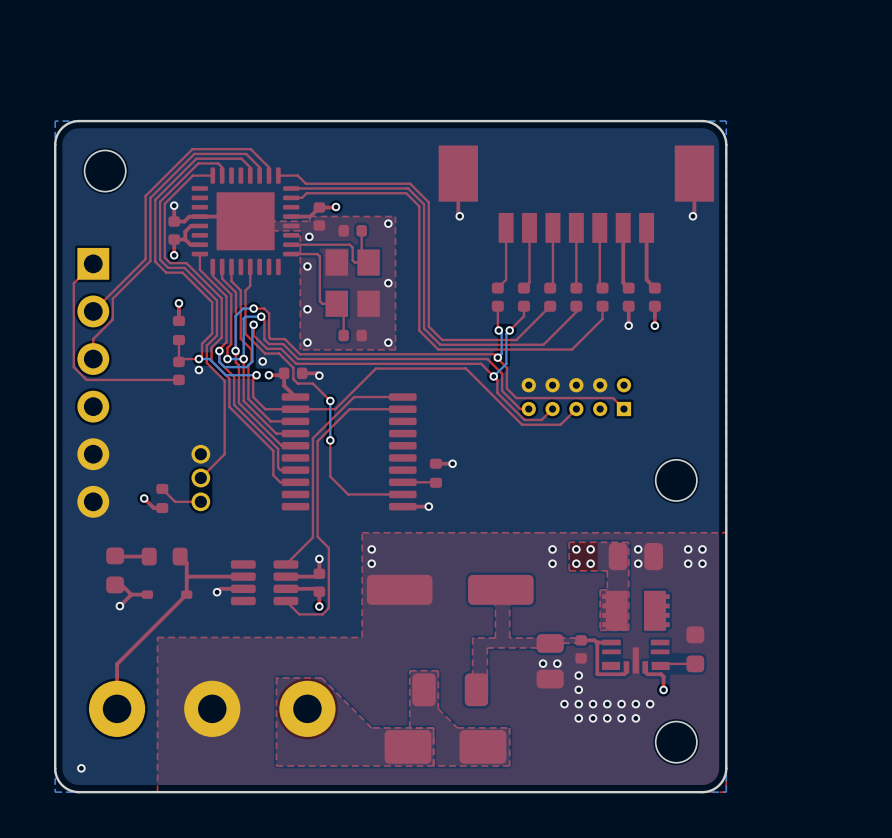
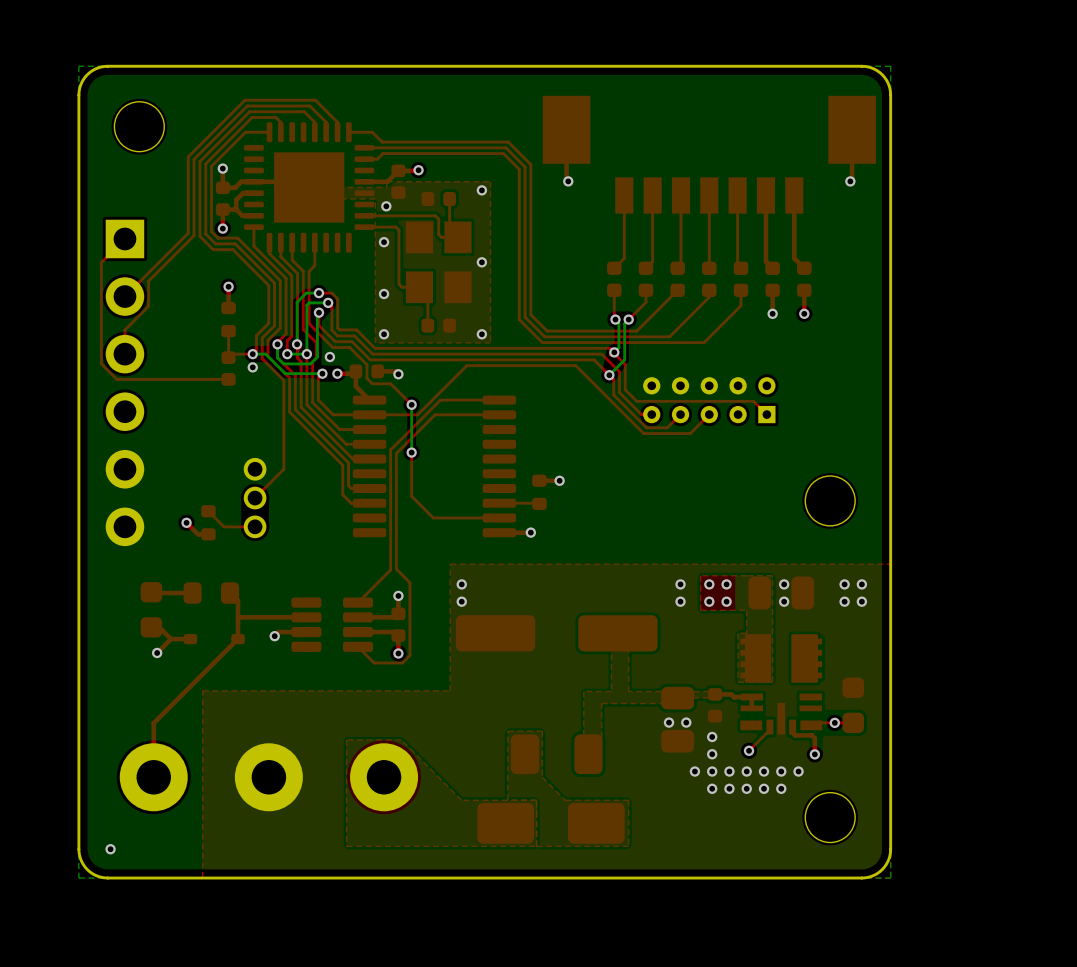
top track: none -> (751, 697) (751, 708)
top track: (597, 643) (597, 674) (624, 674) (626, 669) -> (749, 750) (769, 729)
via: none -> (834, 722)
via: none -> (749, 750)

